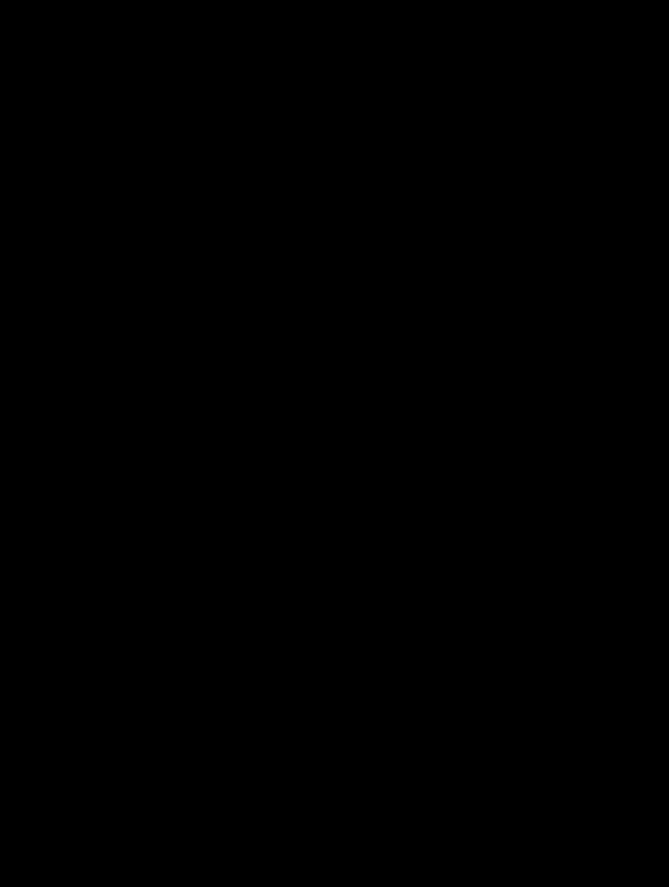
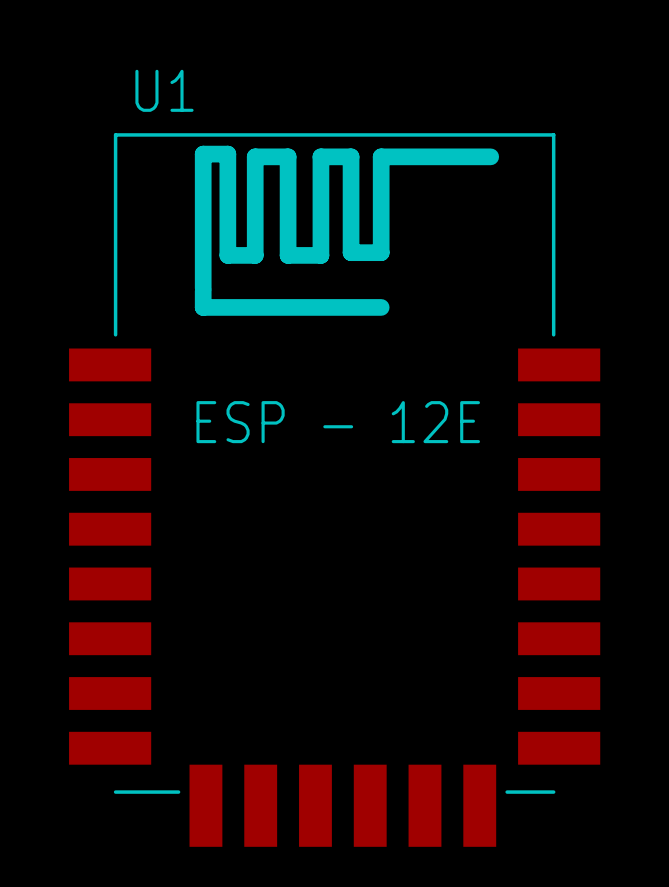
U1: none -> (334, 490)

